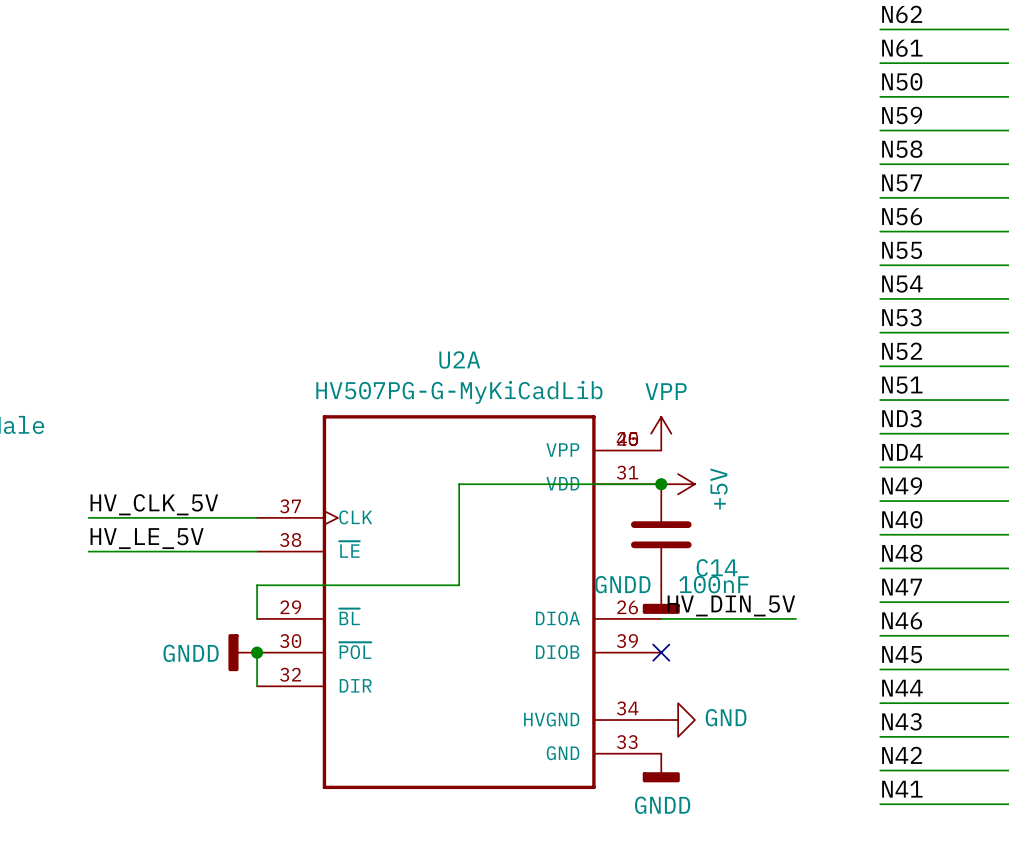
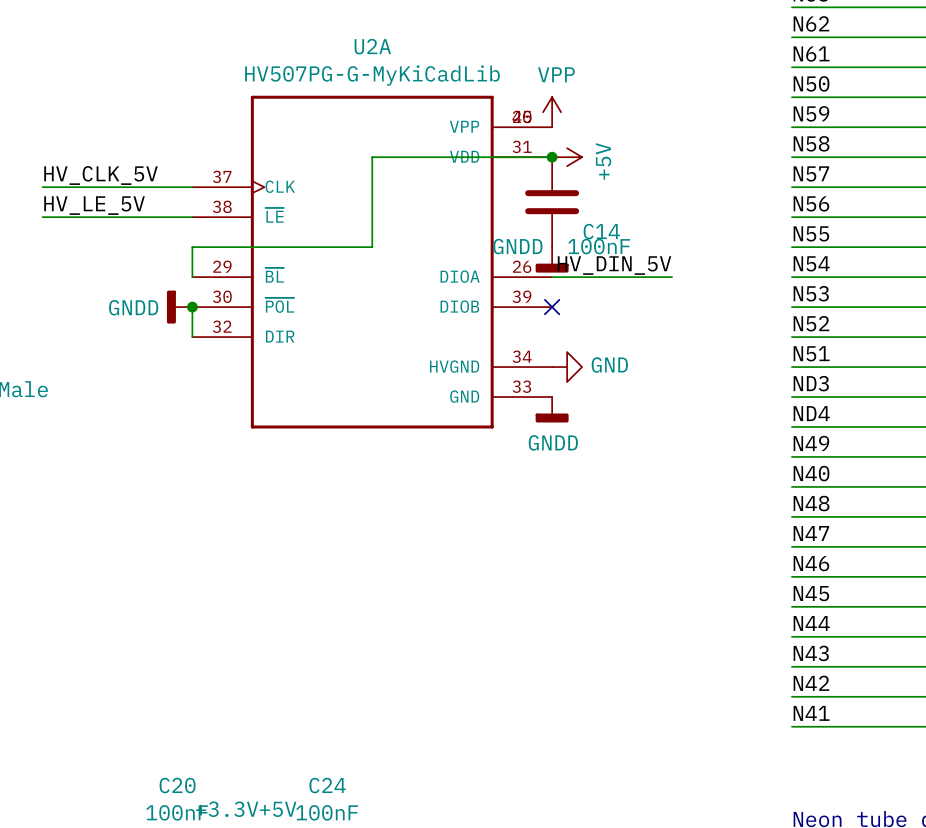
junction: none -> (552, 157)
power symbol: none -> GNDD (552, 259)
power symbol: none -> GNDD (179, 307)
junction: none -> (192, 307)
no-connect mark: none -> (552, 307)
power symbol position: VPP (661, 433) -> VPP (552, 112)
wire: (661, 484) (459, 484) (459, 585) (257, 585) (257, 618) -> (552, 157) (372, 157) (372, 247) (192, 247) (192, 277)
junction: (661, 484) -> none
power symbol position: +5V (678, 484) -> +5V (567, 157)
label position: HV_CLK_5V (154, 504) -> HV_CLK_5V (100, 175)
wire: (88, 517) (257, 517) -> (42, 187) (192, 187)
C14 position: (661, 534) -> (552, 202)
label position: HV_LE_5V (147, 538) -> HV_LE_5V (94, 205)
wire: (88, 551) (257, 551) -> (42, 217) (192, 217)
power symbol text position: GNDD (622, 584) -> GNDD (553, 442)
power symbol position: GNDD (661, 599) -> GNDD (552, 409)
U2A position: (459, 602) -> (372, 262)
label position: HV_DIN_5V (731, 605) -> HV_DIN_5V (614, 265)
wire: (661, 618) (796, 618) -> (552, 277) (672, 277)
power symbol: GNDD (242, 652) -> none
wire: (257, 652) (257, 686) -> (192, 307) (192, 337)
junction: (257, 652) -> none
no-connect mark: (661, 652) -> none
power symbol position: GND (678, 720) -> GND (567, 367)
power symbol: GNDD (661, 768) -> none

